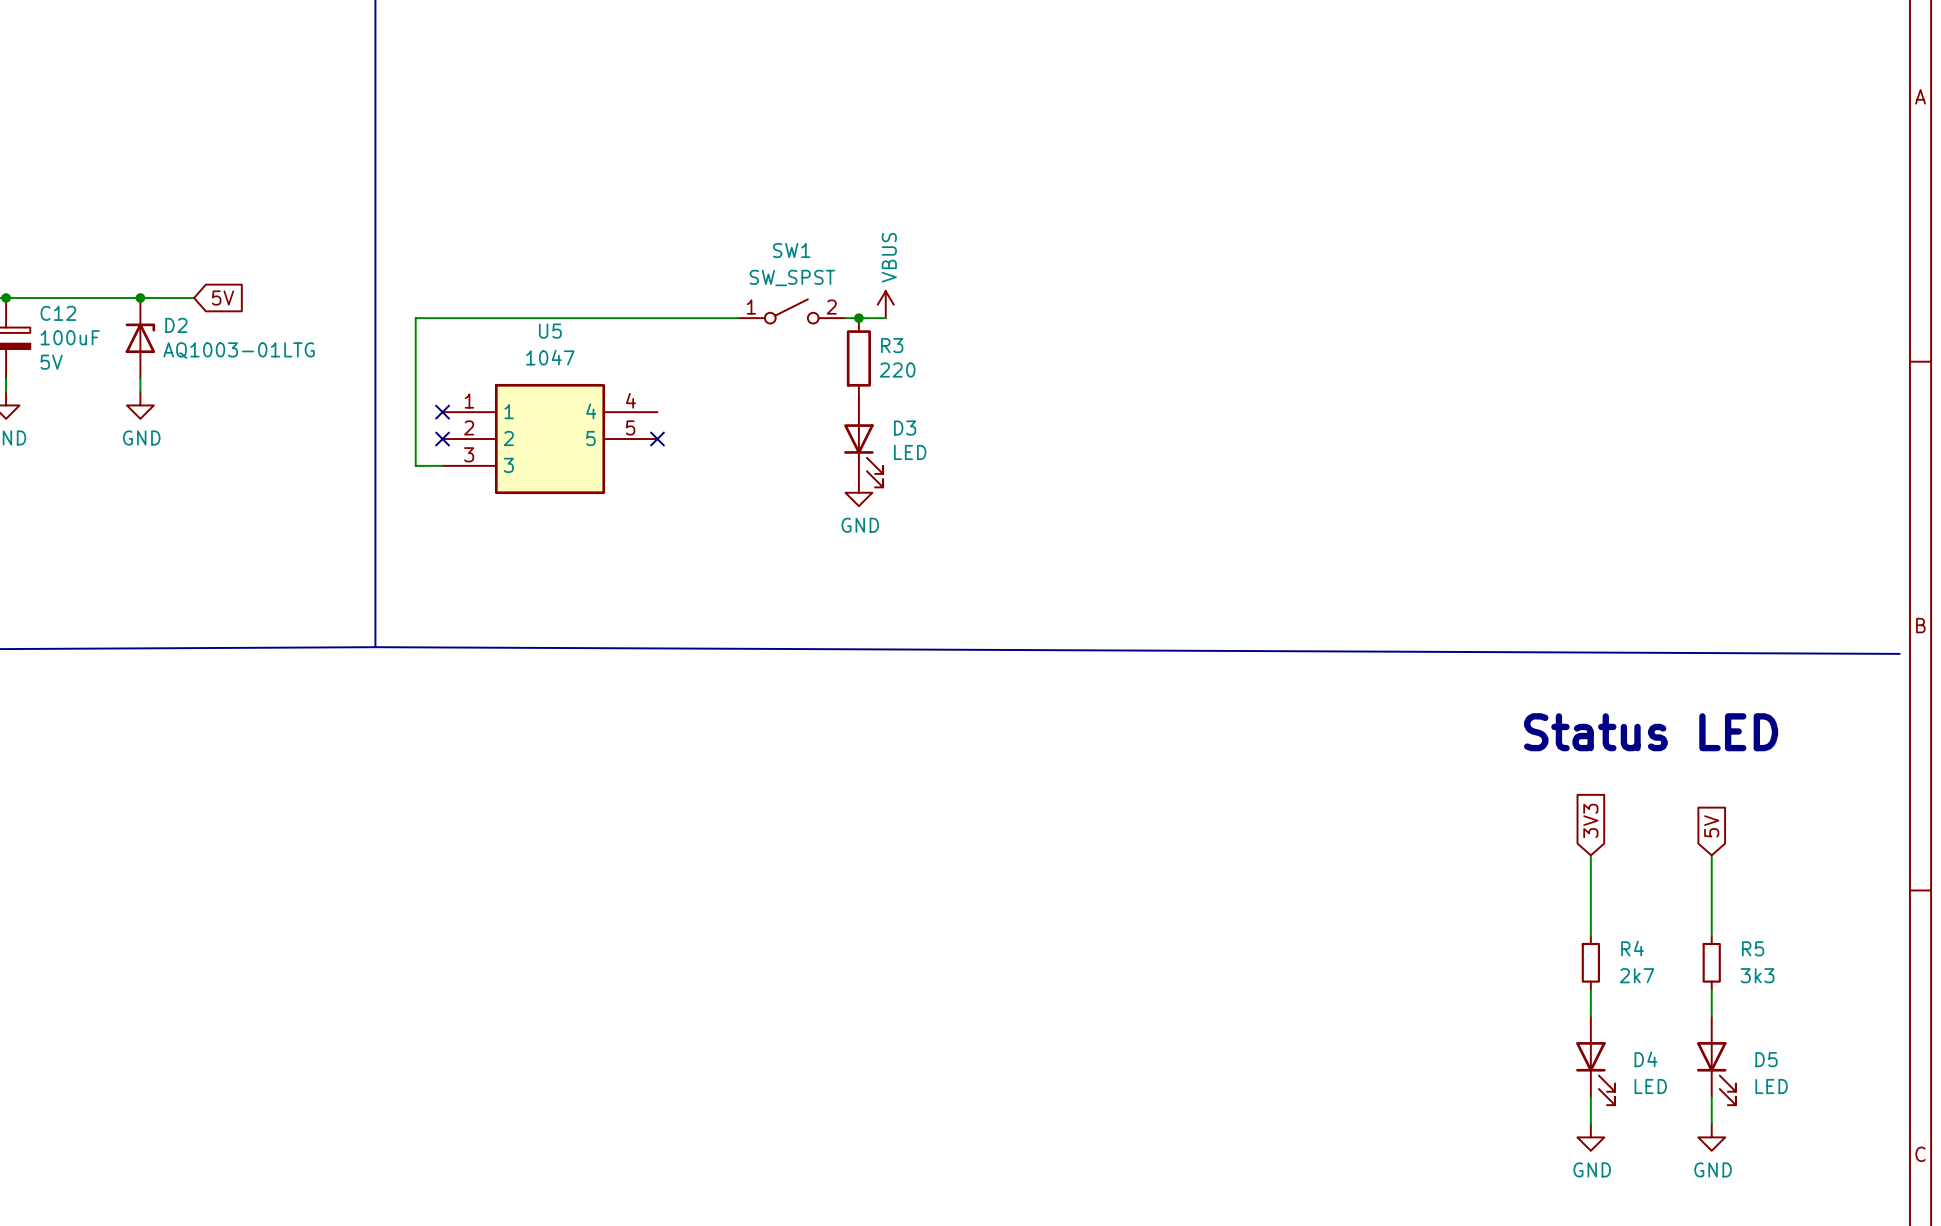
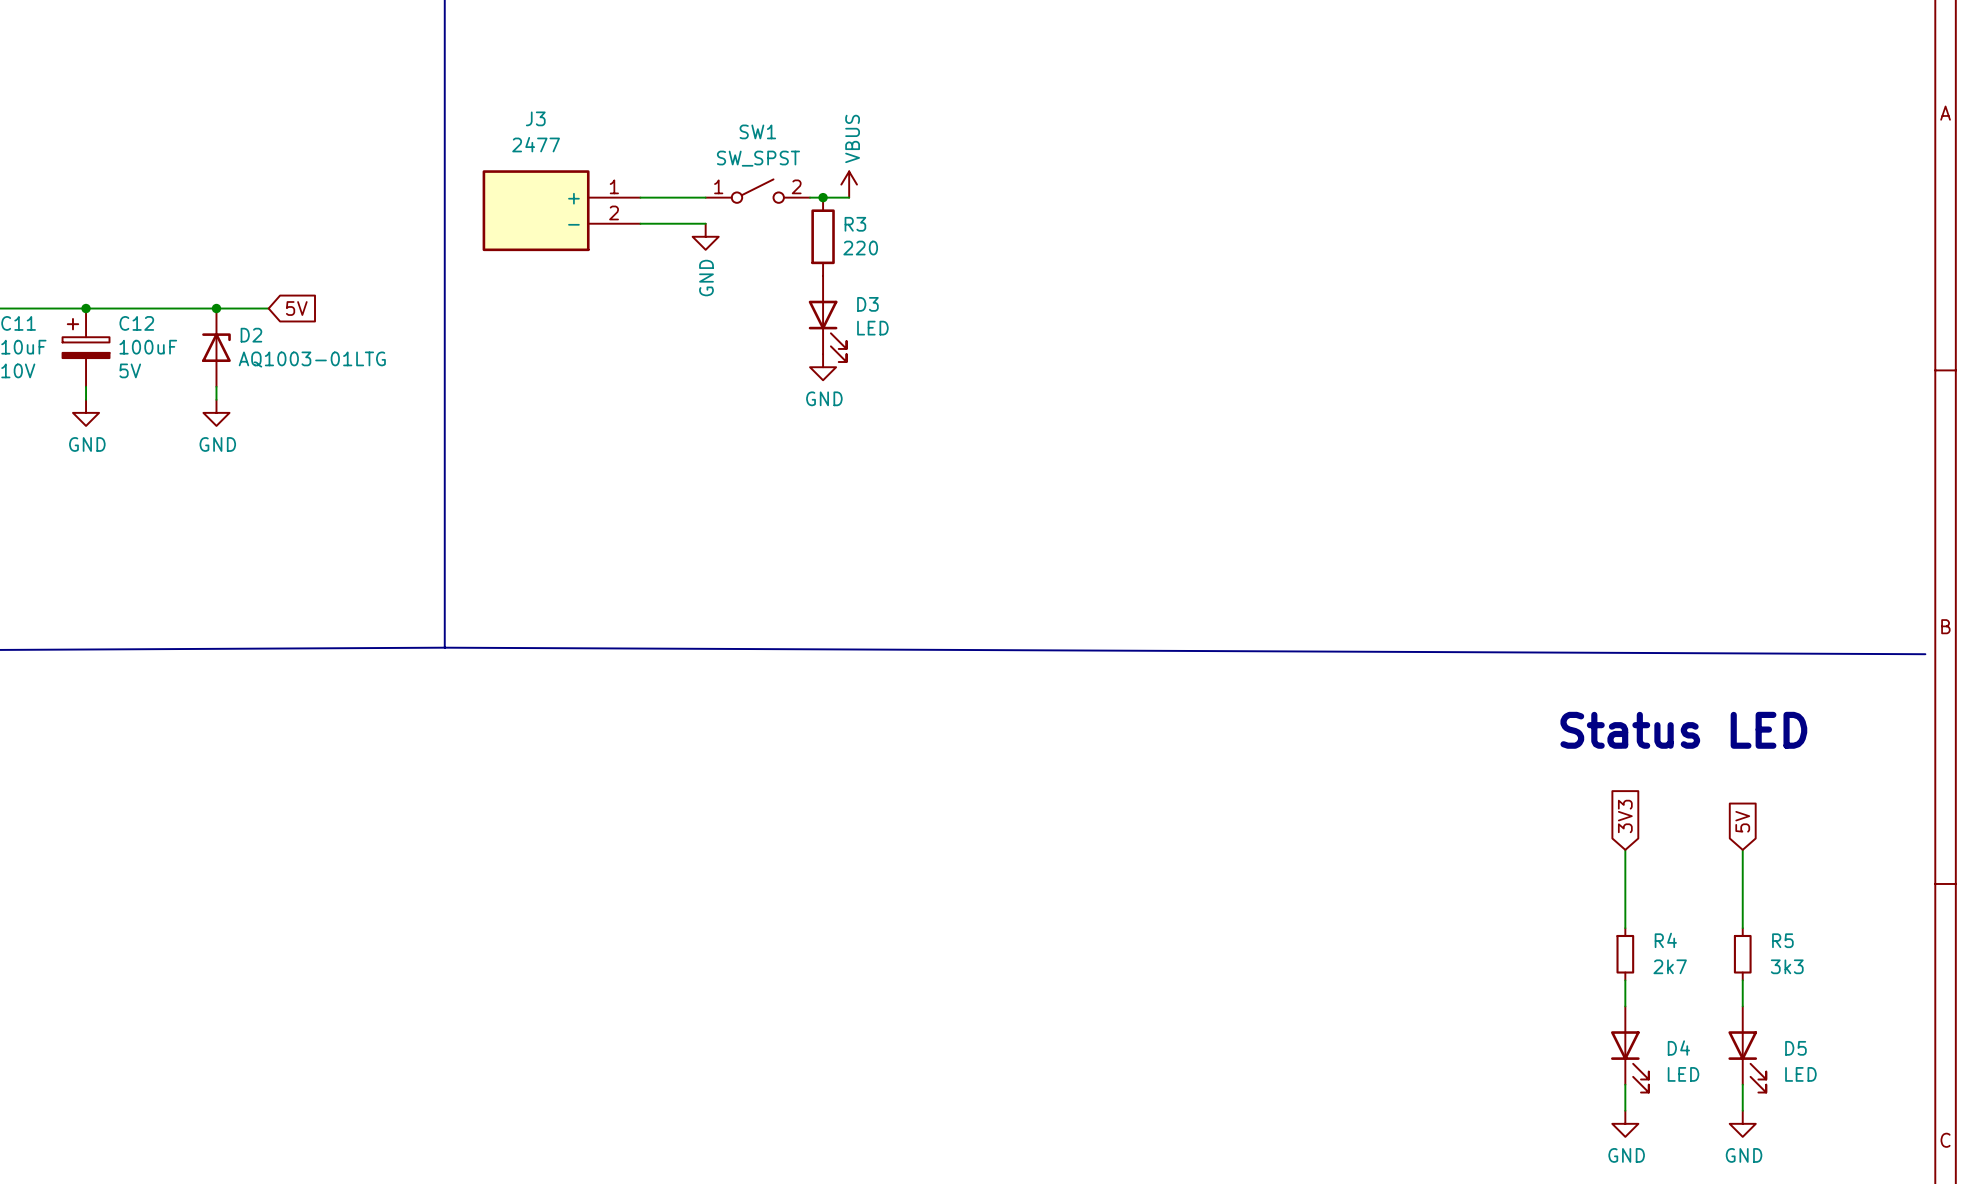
wire: none -> (640, 197) (705, 197)
junction: none -> (823, 197)
J3: none -> 2477 (561, 210)
wire: none -> (640, 223) (705, 223)
power symbol: none -> GND (705, 236)
power symbol position: VBUS (885, 304) -> VBUS (849, 184)
SW1 position: (791, 311) -> (757, 191)
wire: (738, 318) (415, 318) (415, 465) (442, 465) -> none
wire: (845, 318) (885, 318) -> (810, 197) (849, 197)
junction: (858, 318) -> none
R3 position: (858, 358) -> (823, 236)
no-connect mark: (442, 412) -> none
no-connect mark: (442, 439) -> none
U5: 1047 (550, 439) -> none
no-connect mark: (657, 439) -> none
D3 position: (863, 443) -> (827, 318)
power symbol position: GND (858, 492) -> GND (823, 367)

